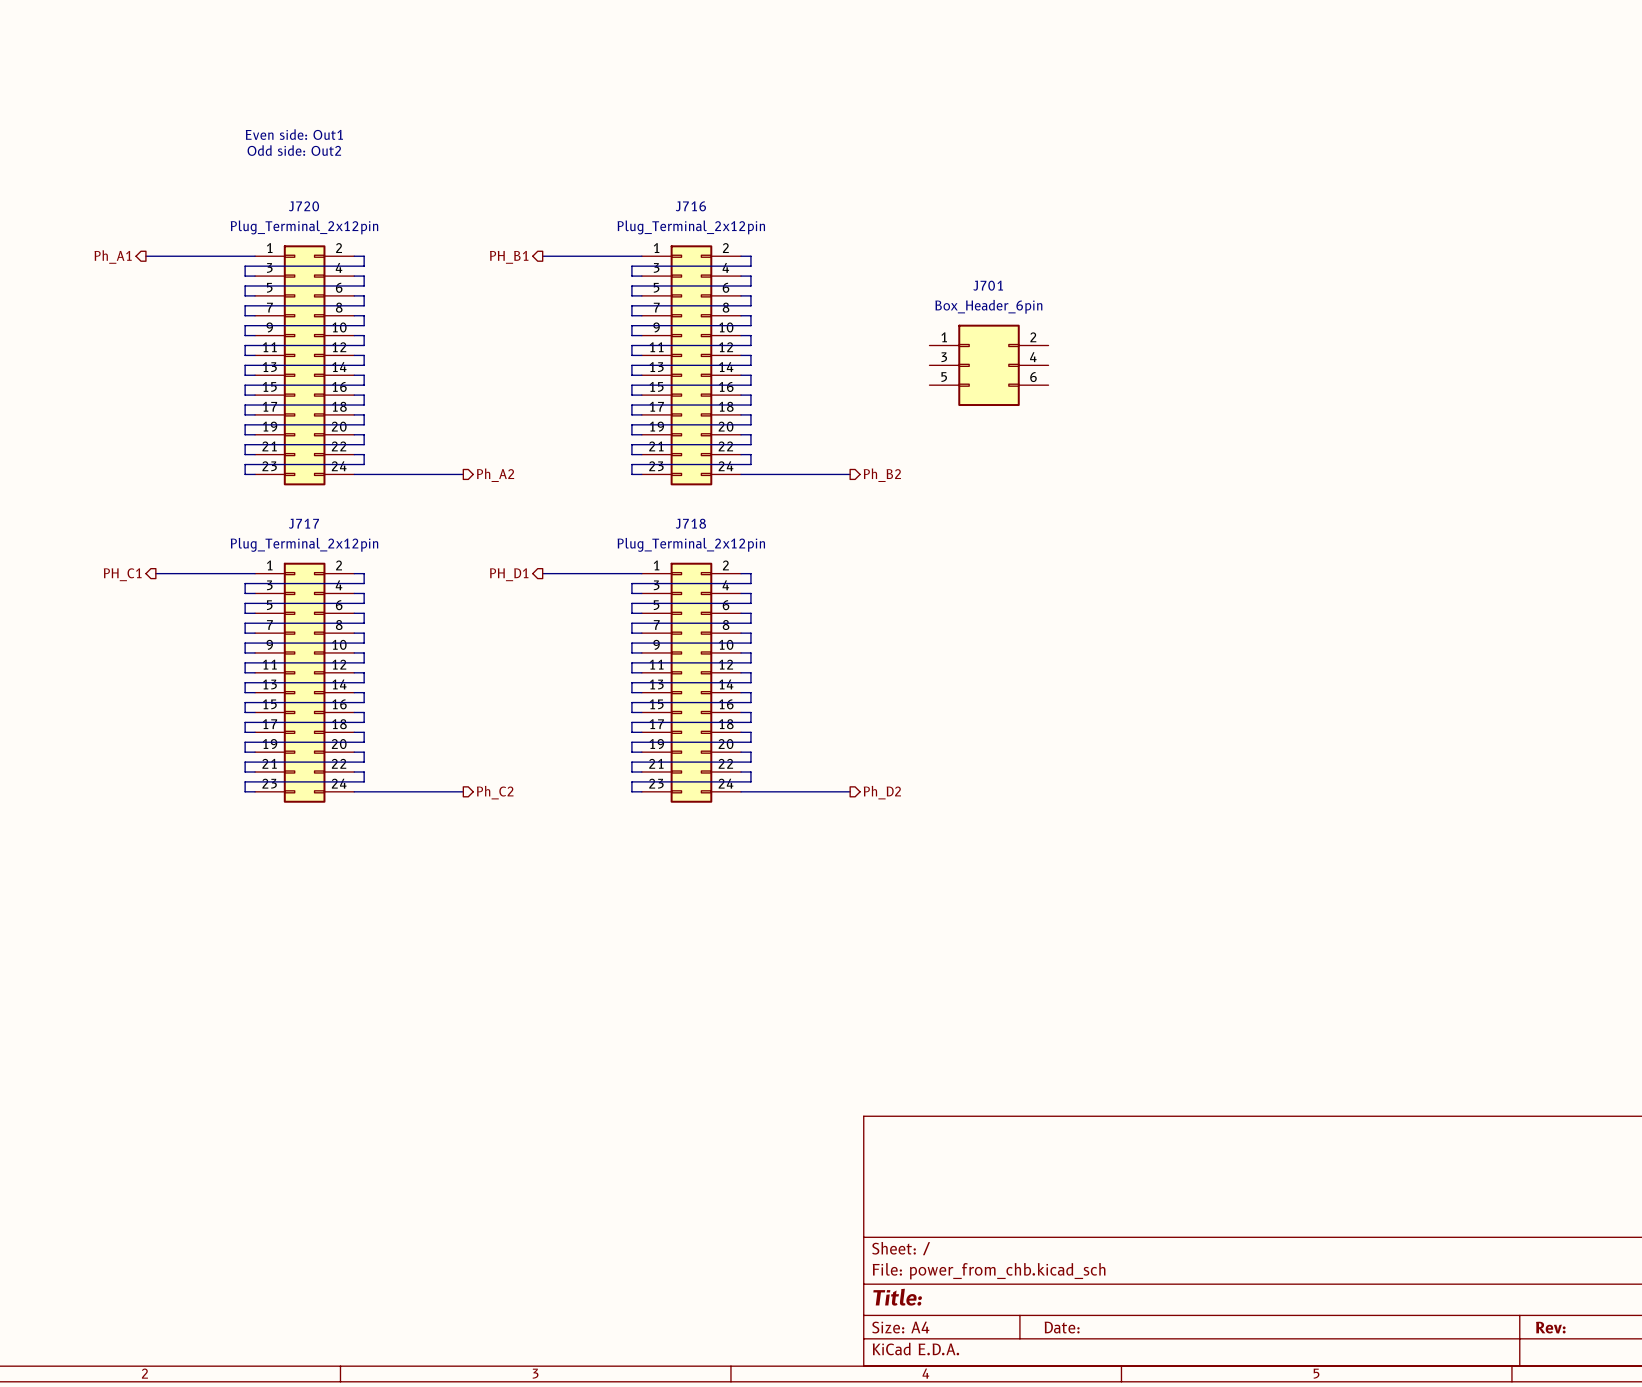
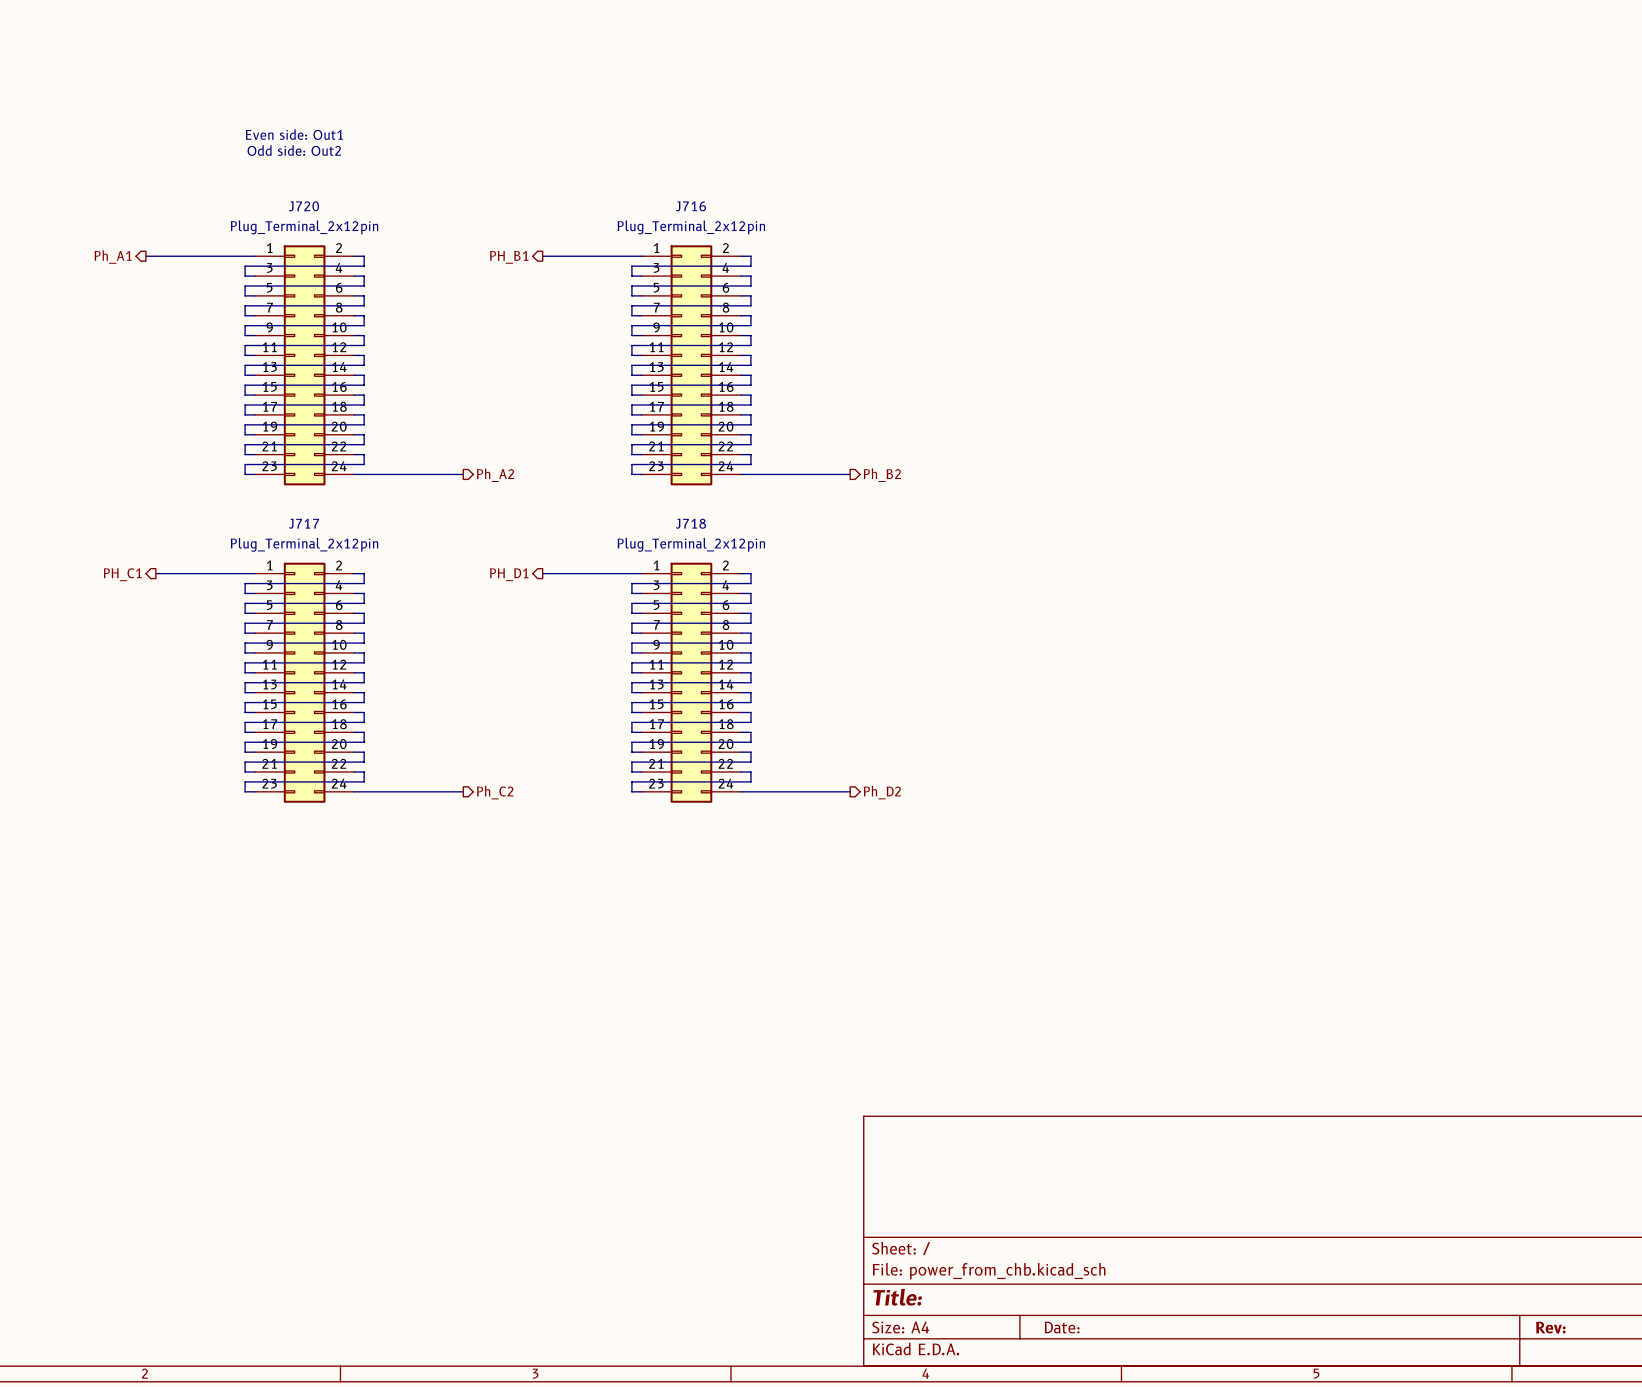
J701: Box_Header_6pin (989, 365) -> none

